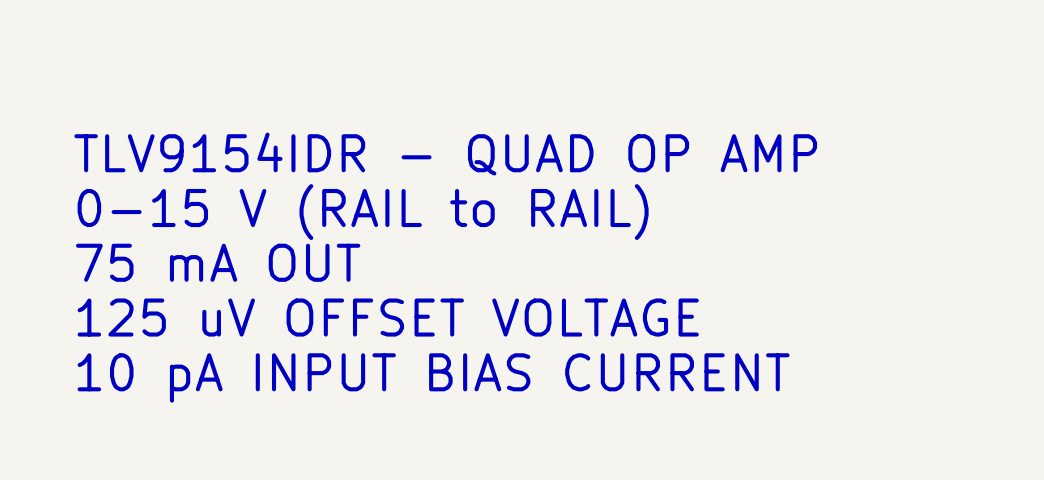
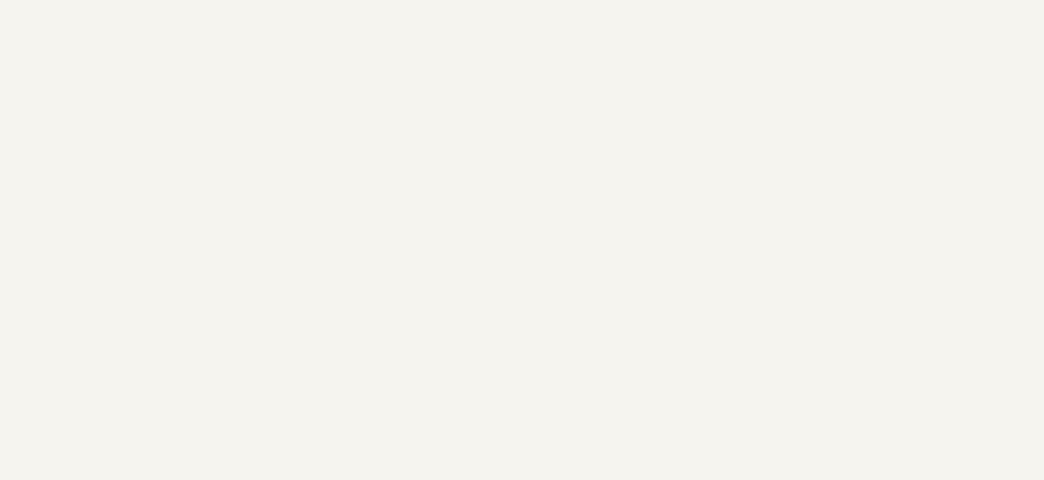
text: TLV9154IDR - QUAD OP AMP (445, 154) -> none
text: 0-15 V (RAIL to RAIL) (363, 212) -> none
text: 75 mA OUT (218, 262) -> none
text: 125 uV OFFSET VOLTAGE (388, 317) -> none
text: 10 pA INPUT BIAS CURRENT (433, 377) -> none

